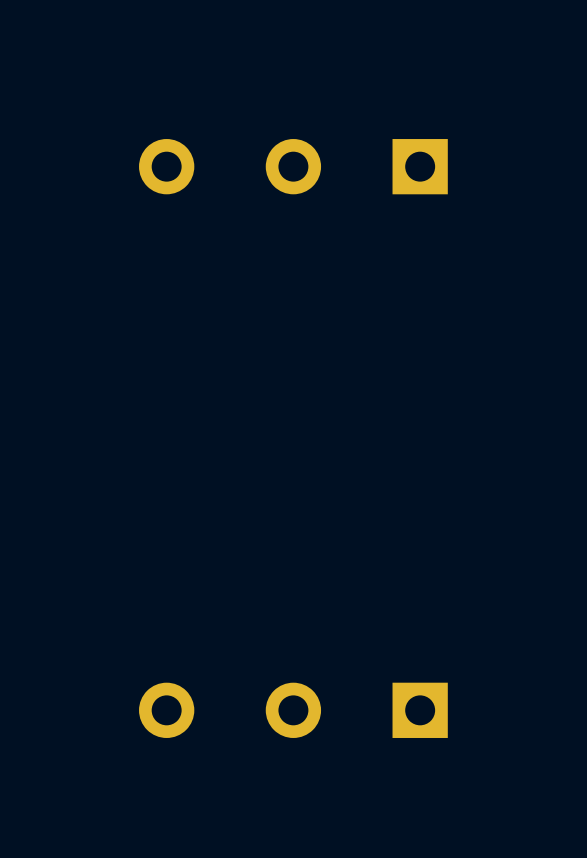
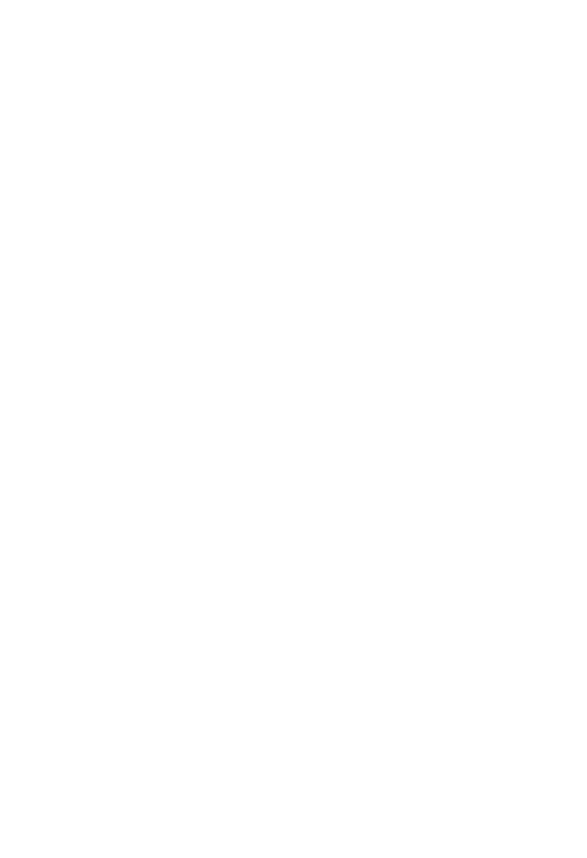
part: (293, 166) -> none
part: (293, 710) -> none

